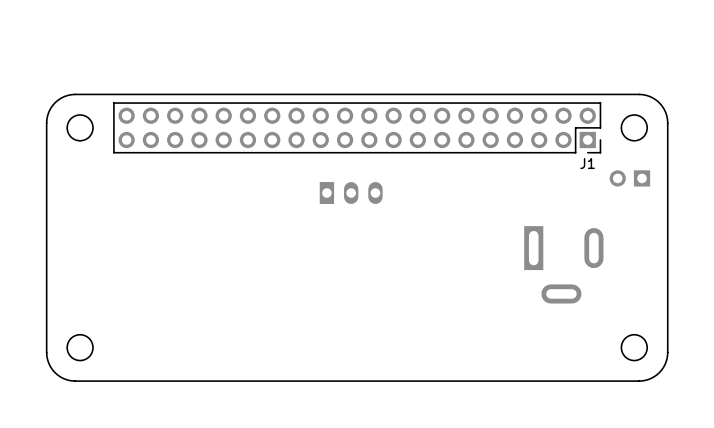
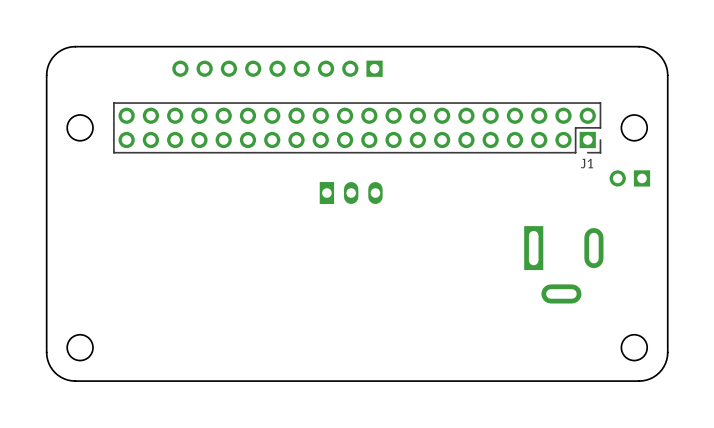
part: none -> (277, 68)
board edge: (667, 123) (665, 112) (659, 102) (650, 96) (639, 94) (75, 94) (64, 96) (55, 102) (48, 112) (46, 123) -> (667, 123) (667, 75) (665, 64) (653, 50) (639, 46) (71, 46) (55, 55) (47, 67) (46, 123)

